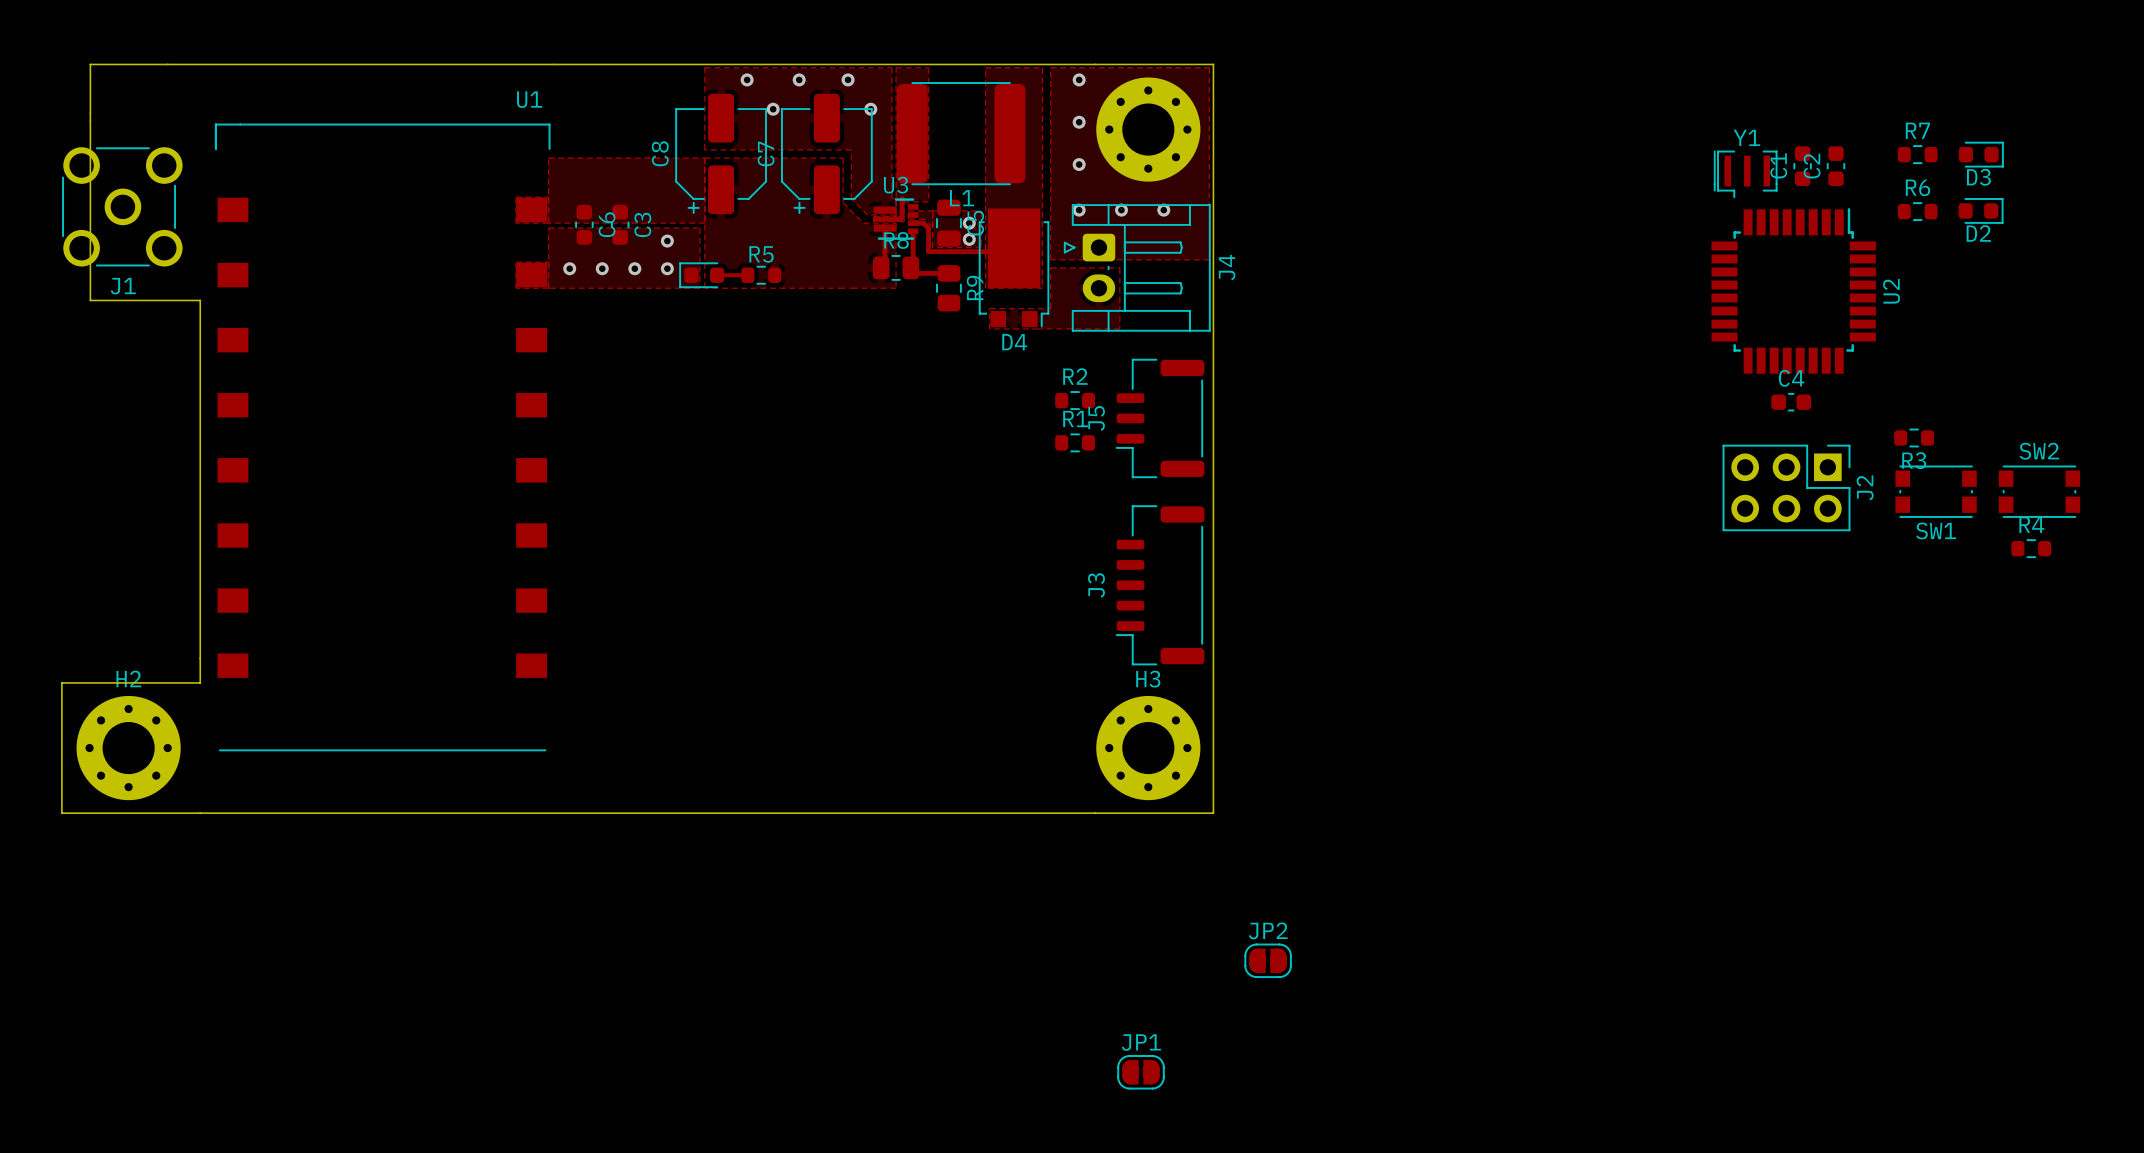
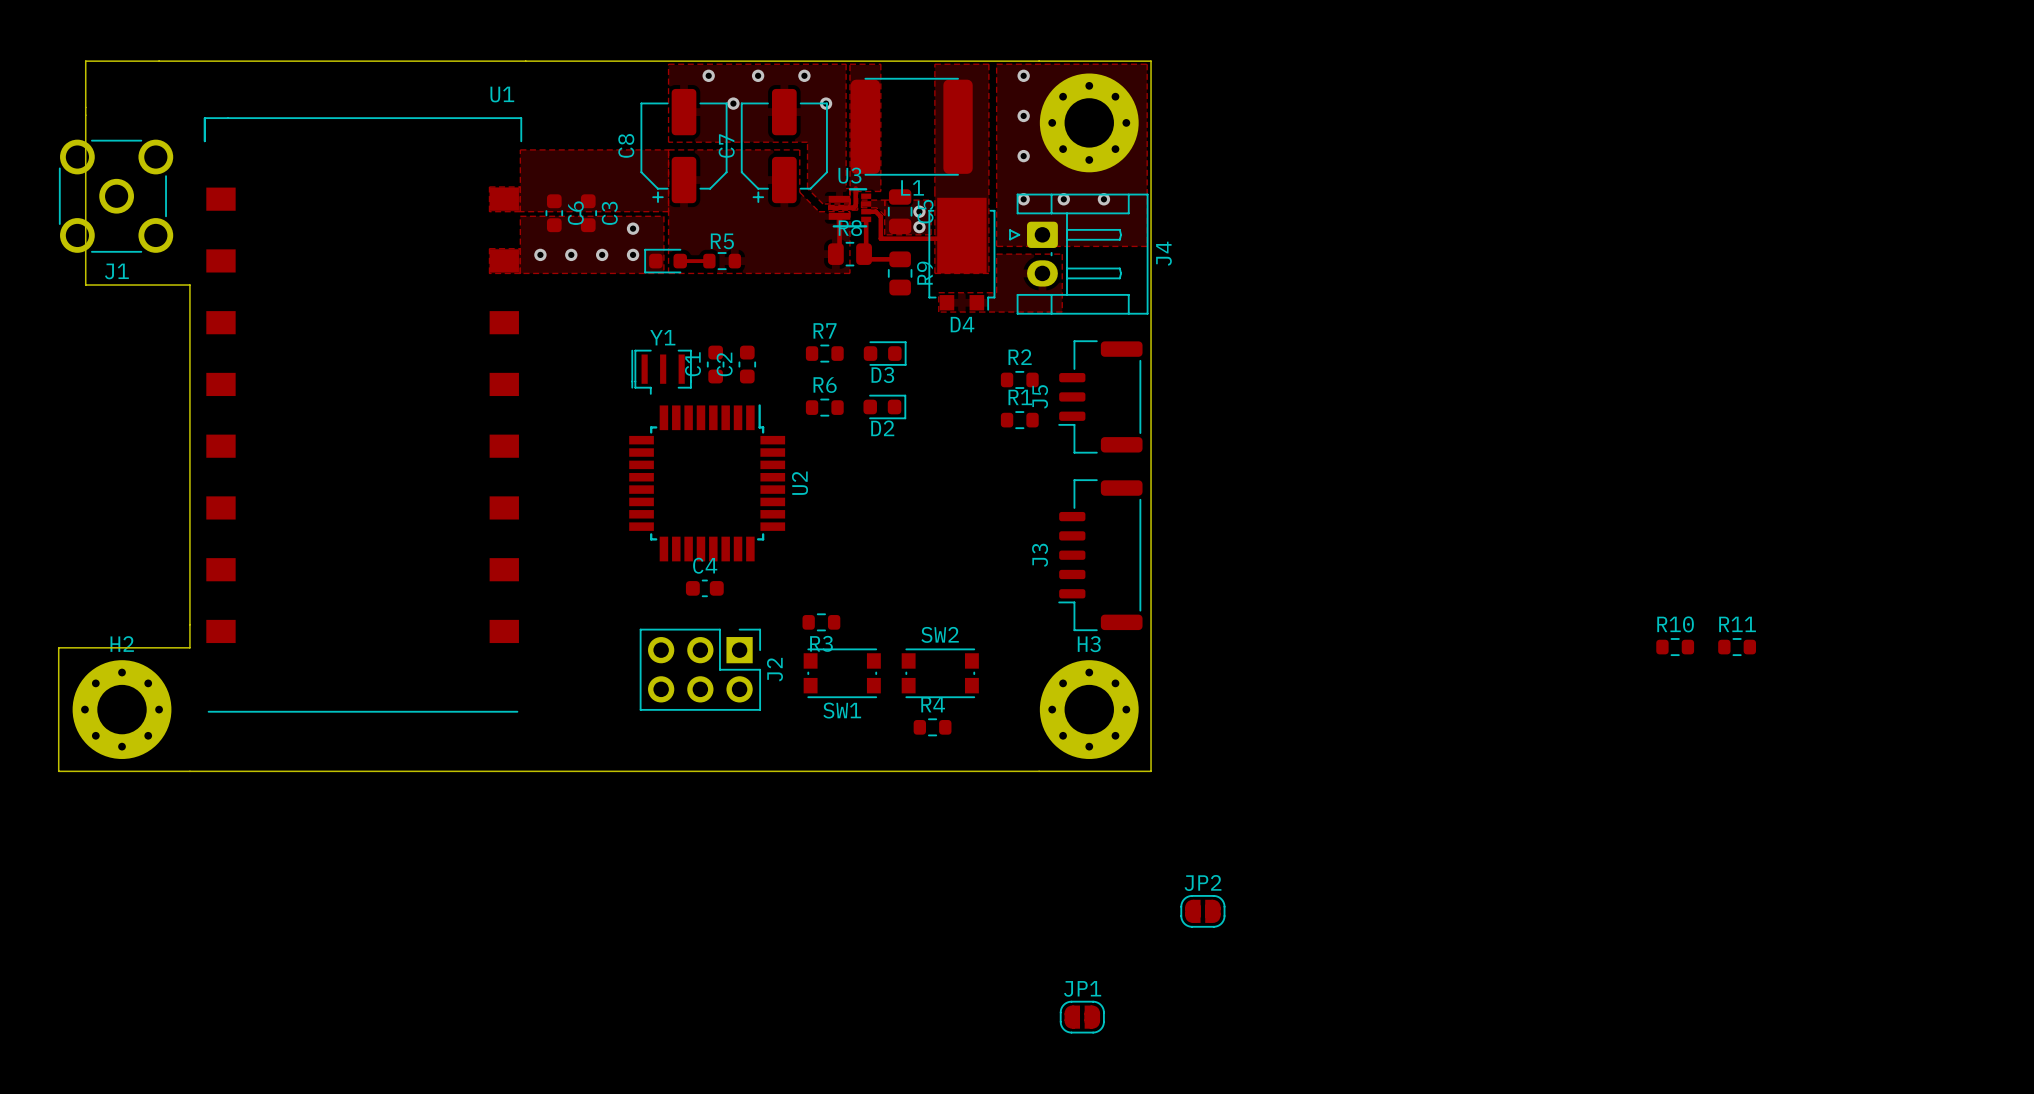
R7 position: (1917, 154) -> (824, 353)
D3 position: (1981, 154) -> (885, 353)
C1 position: (1802, 166) -> (715, 364)
C2 position: (1835, 166) -> (747, 364)
Y1 position: (1745, 174) -> (661, 372)
D2 position: (1981, 210) -> (884, 406)
R6 position: (1917, 211) -> (824, 407)
U2 position: (1793, 290) -> (707, 482)
C4 position: (1791, 402) -> (704, 588)
R3 position: (1914, 438) -> (821, 622)
J2 position: (1786, 487) -> (700, 669)
SW1 position: (1936, 491) -> (842, 673)
SW2 position: (2039, 491) -> (940, 673)
R4 position: (2031, 548) -> (932, 727)
R10: none -> (1675, 647)
R11: none -> (1737, 647)

